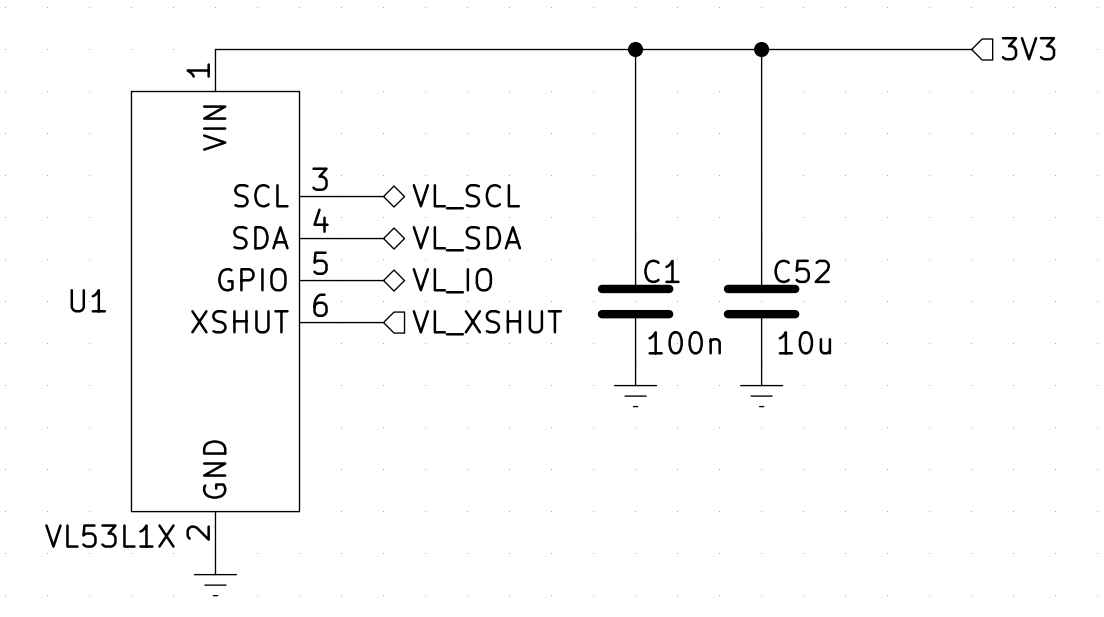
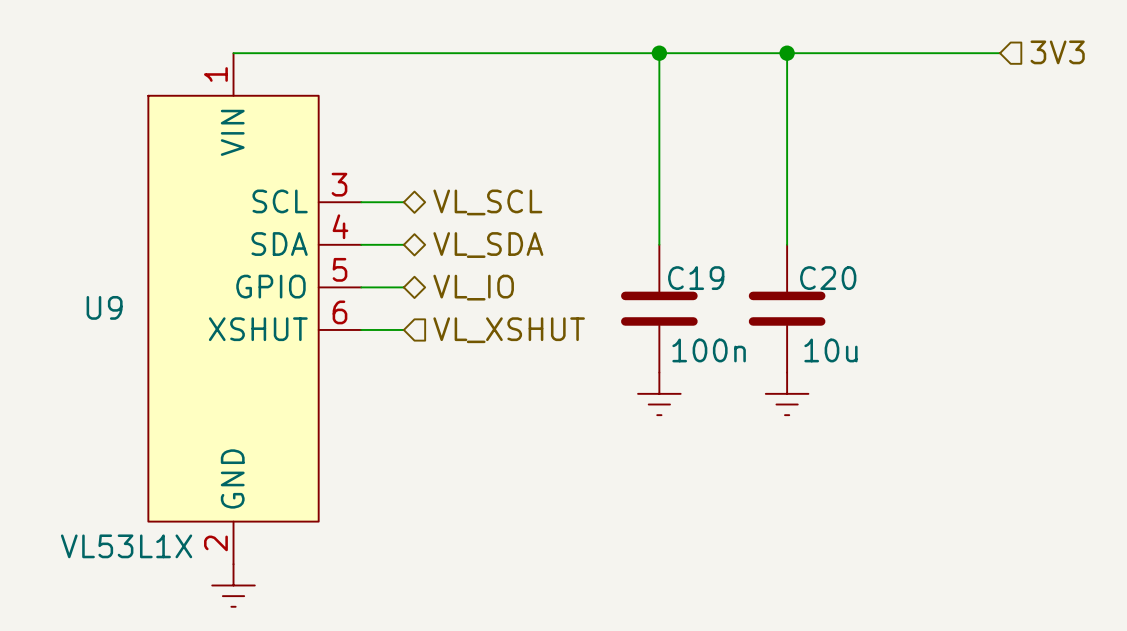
C1 name: C1 (661, 271) -> C19 (696, 278)
C52 name: C52 (802, 271) -> C20 (828, 278)
U1 name: U1 (88, 300) -> U9 (104, 307)

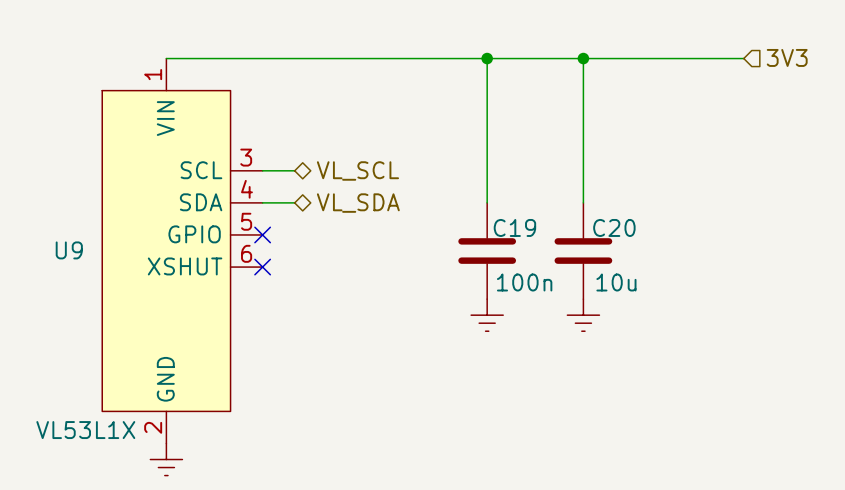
wire: (361, 287) (403, 287) -> none
no-connect mark: none -> (262, 234)
hierarchical label: VL_IO (473, 287) -> none
wire: (361, 329) (403, 329) -> none
no-connect mark: none -> (262, 267)
hierarchical label: VL_XSHUT (509, 330) -> none

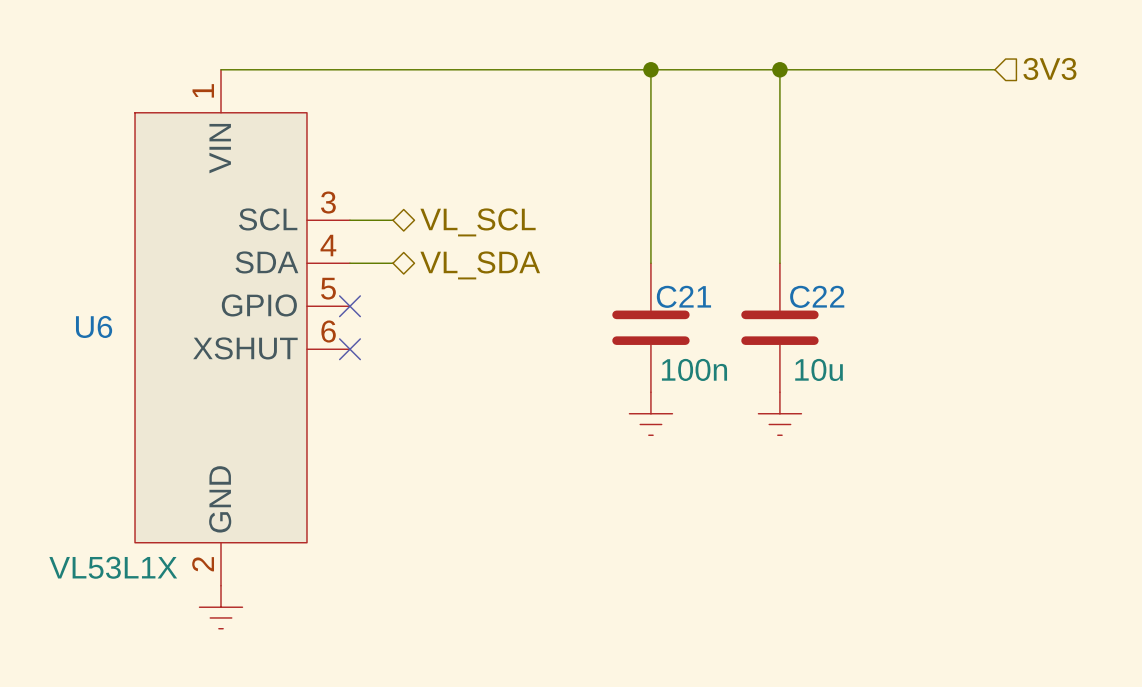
C19 name: C19 (514, 227) -> C21 (683, 296)
C20 name: C20 (614, 227) -> C22 (817, 296)
U9 name: U9 (69, 250) -> U6 (94, 326)

